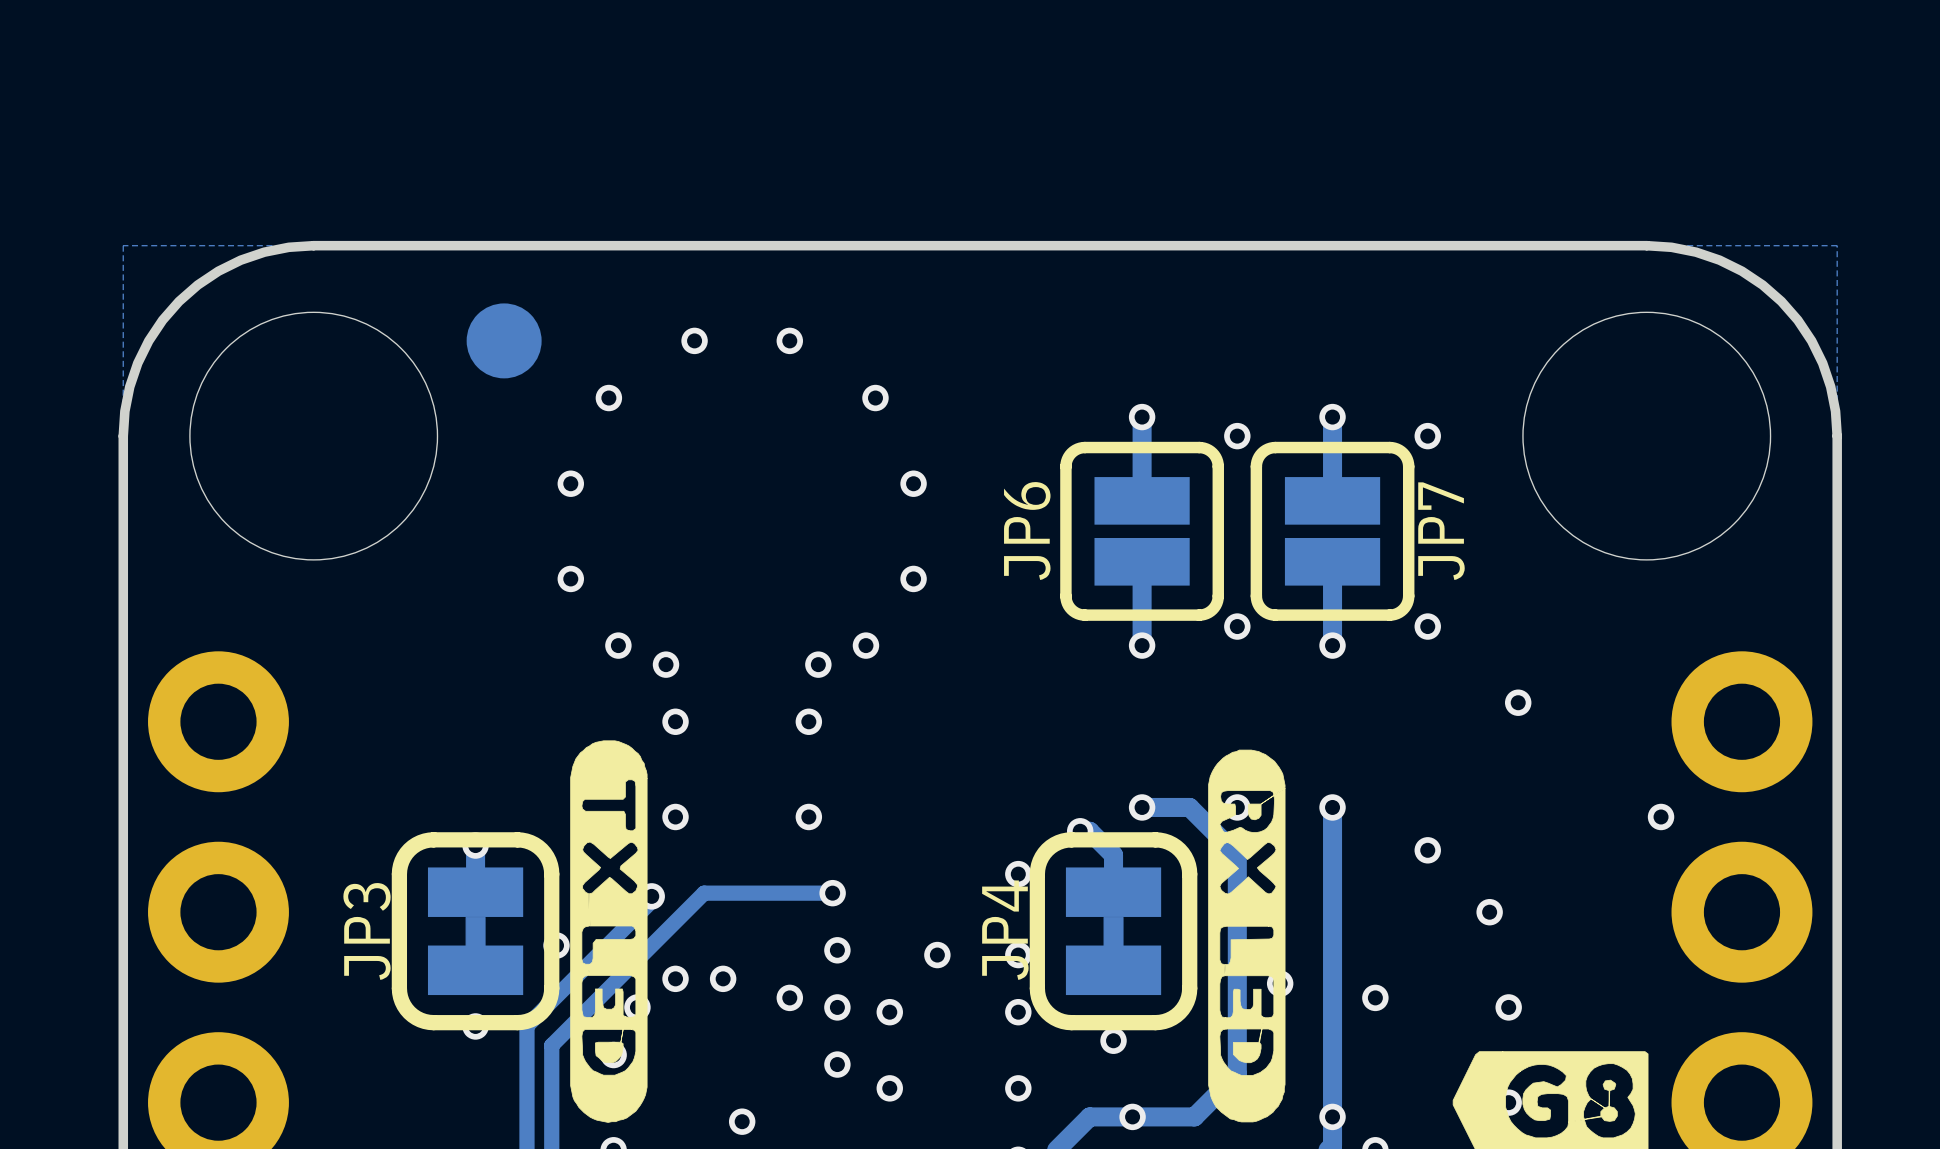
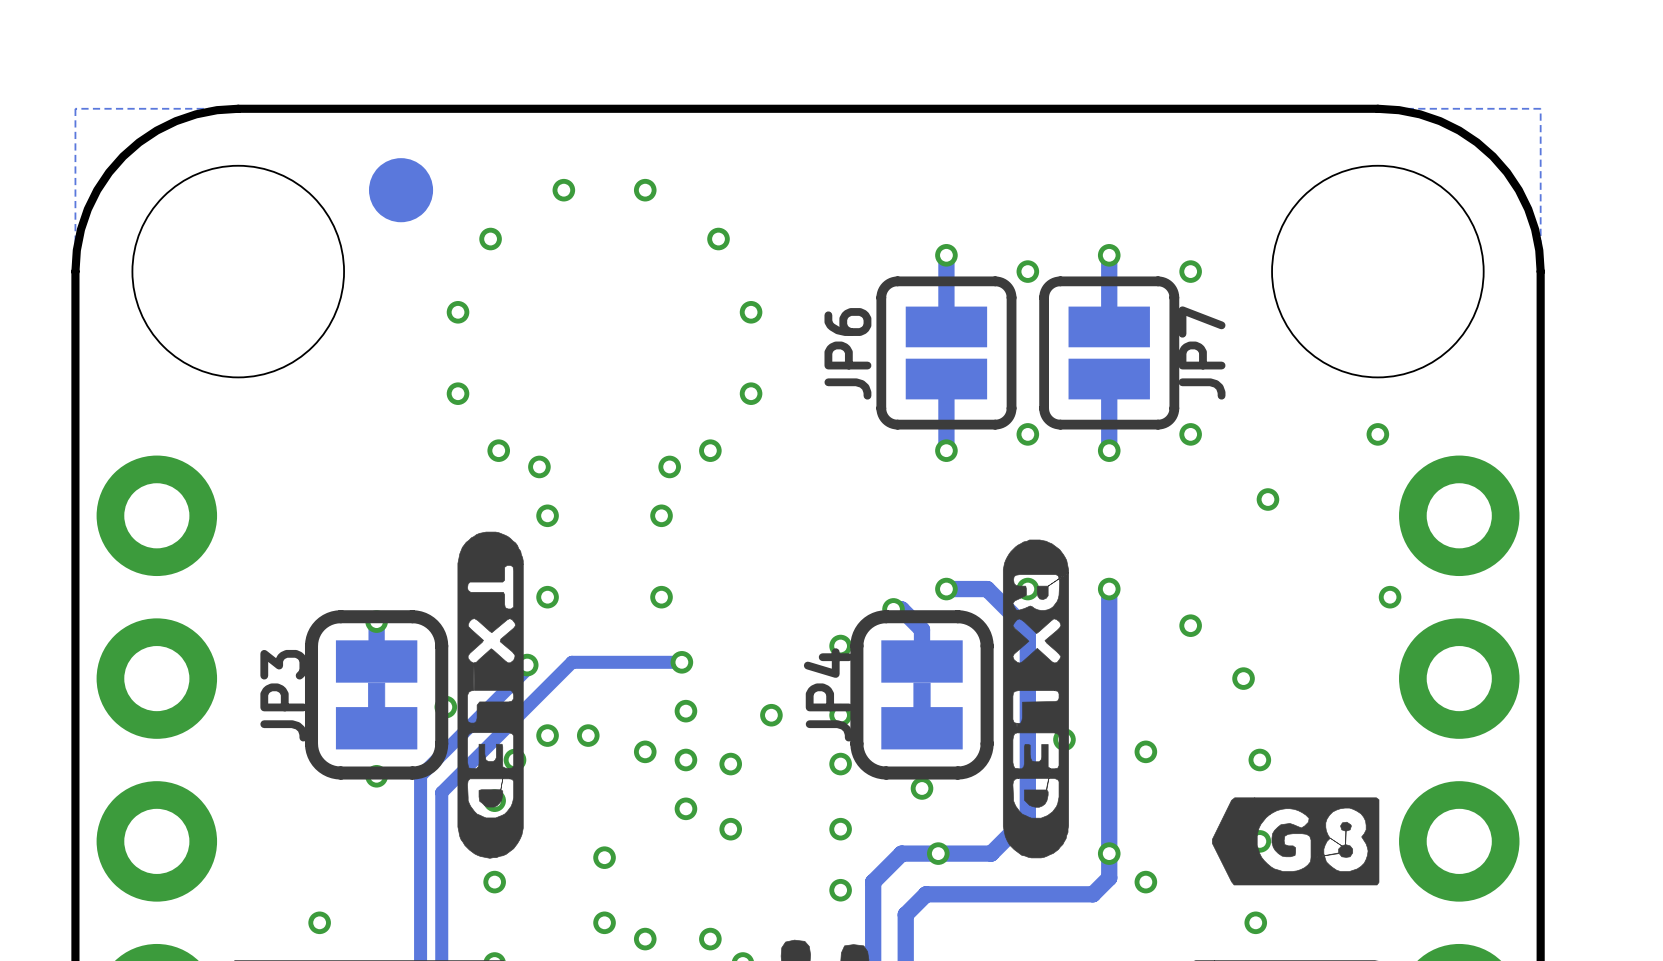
via: none -> (1377, 434)

